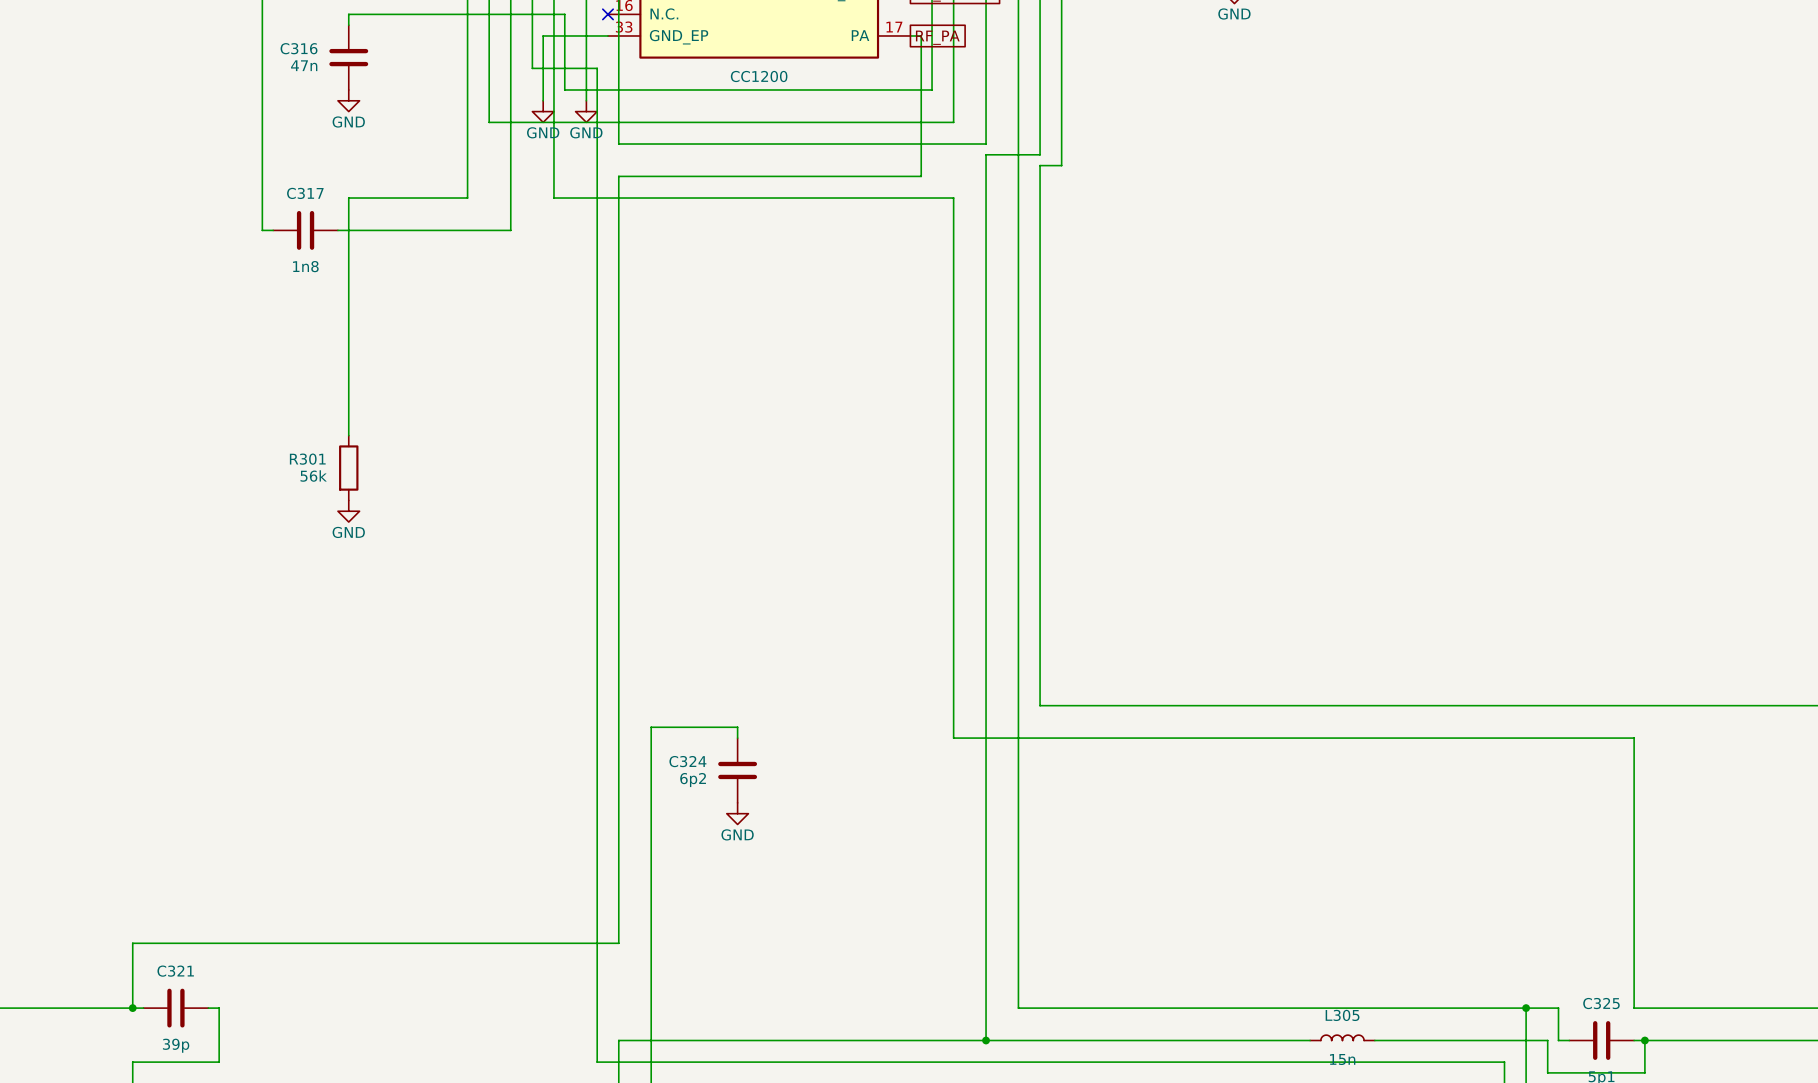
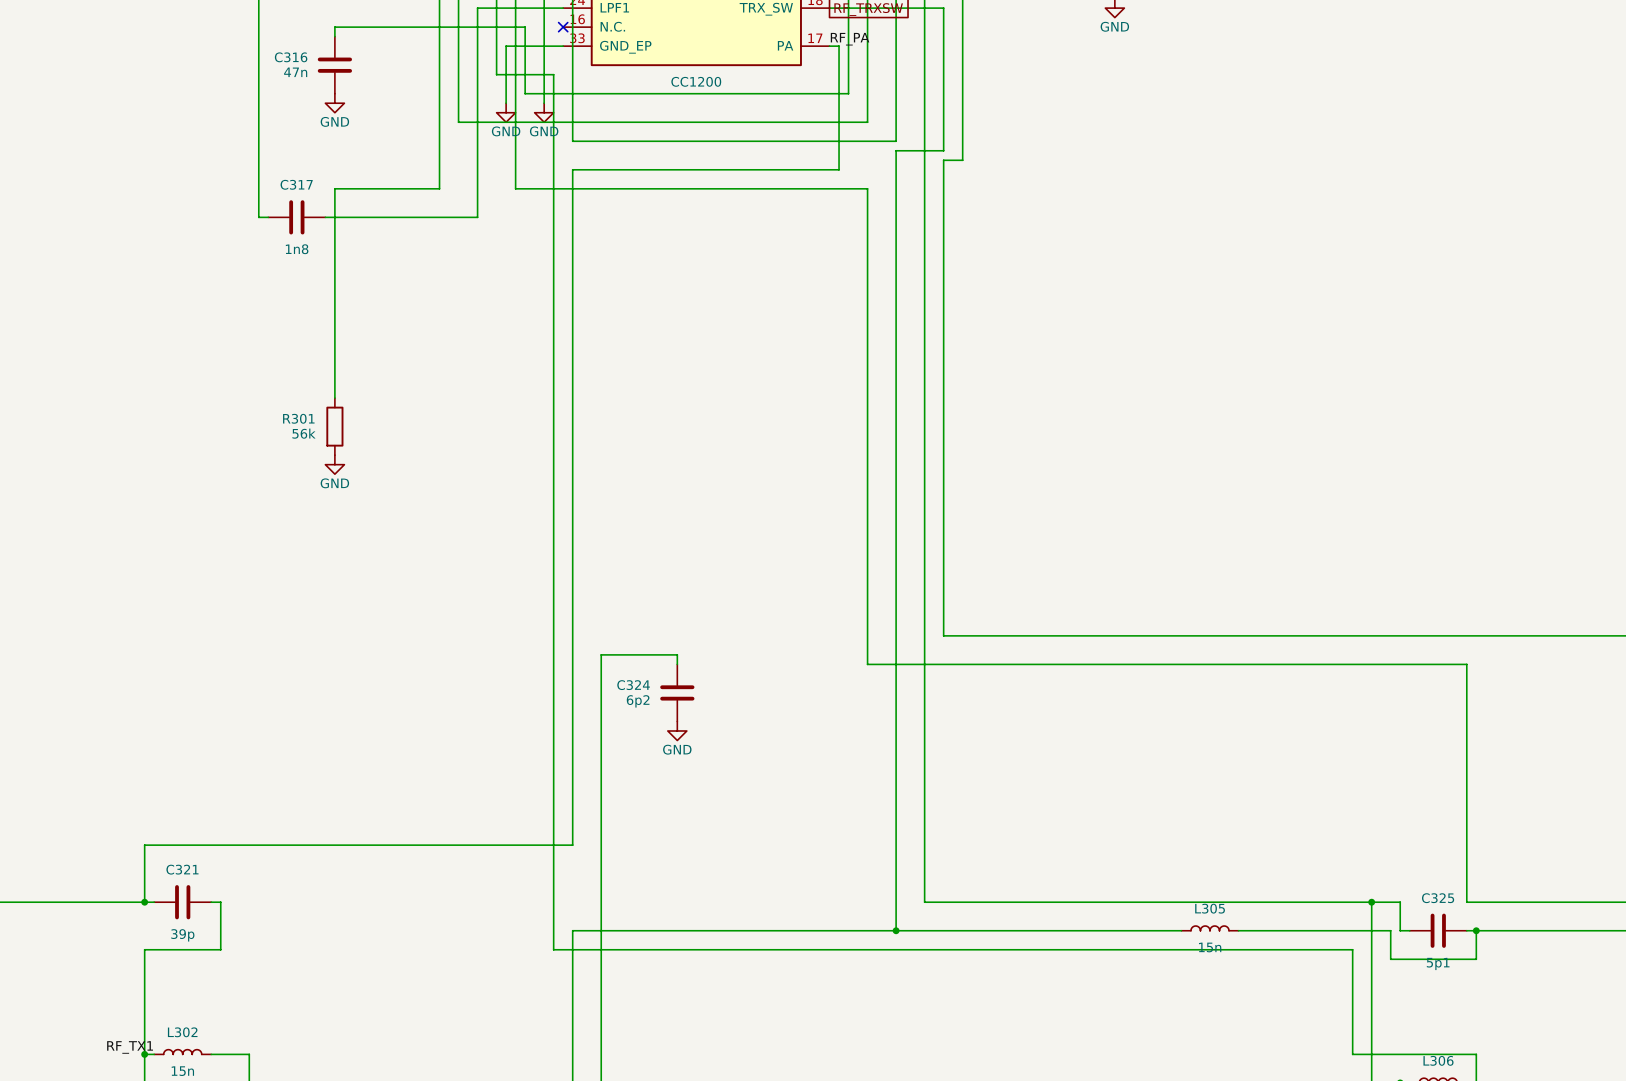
label: none -> RF_PA (850, 39)
global label: RF_PA (937, 37) -> none

